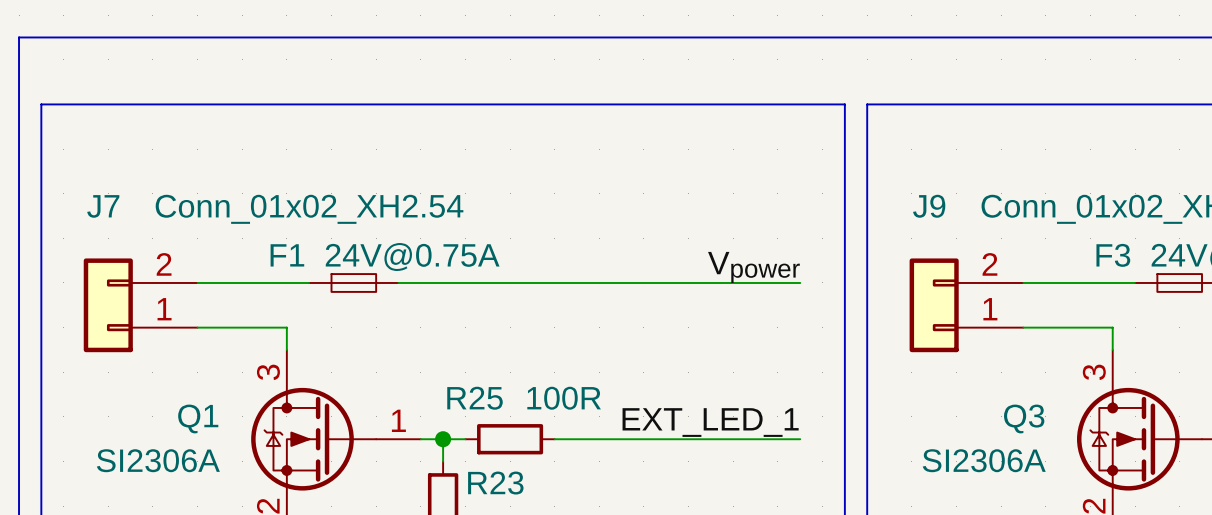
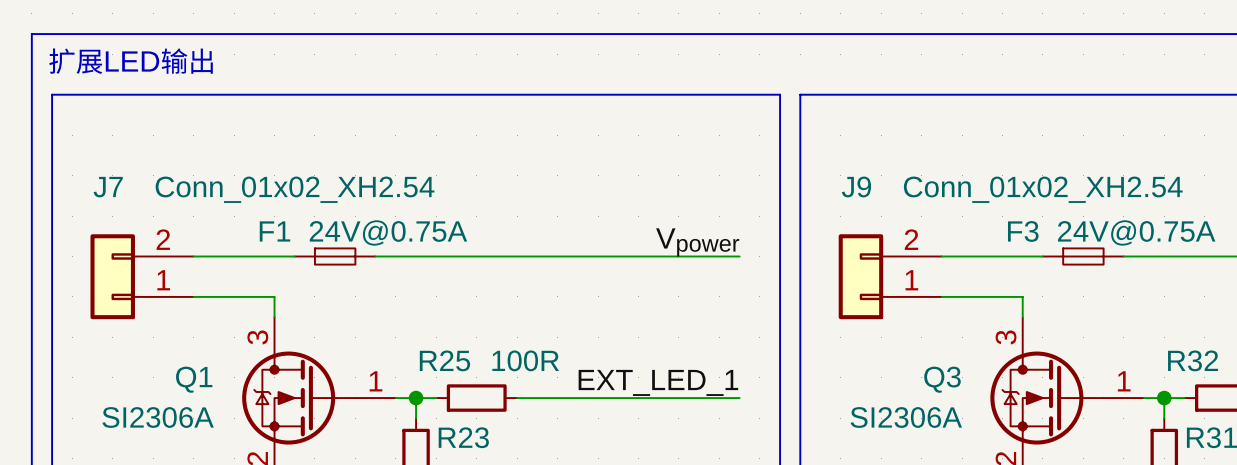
text: none -> 扩展LED输出 (131, 61)

